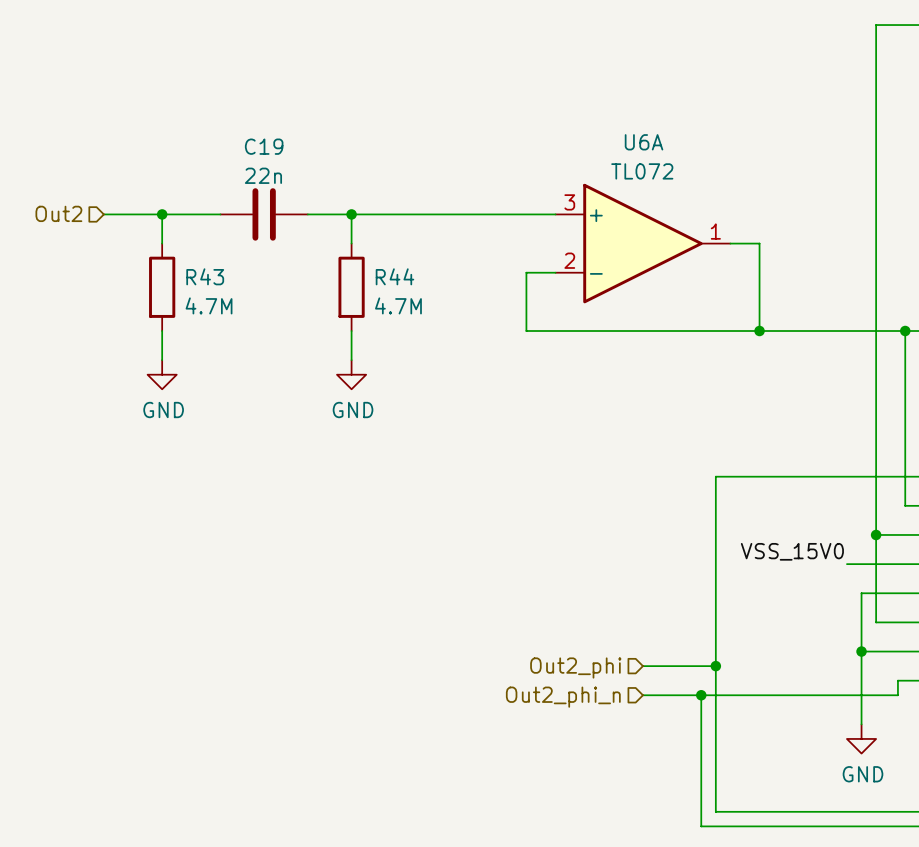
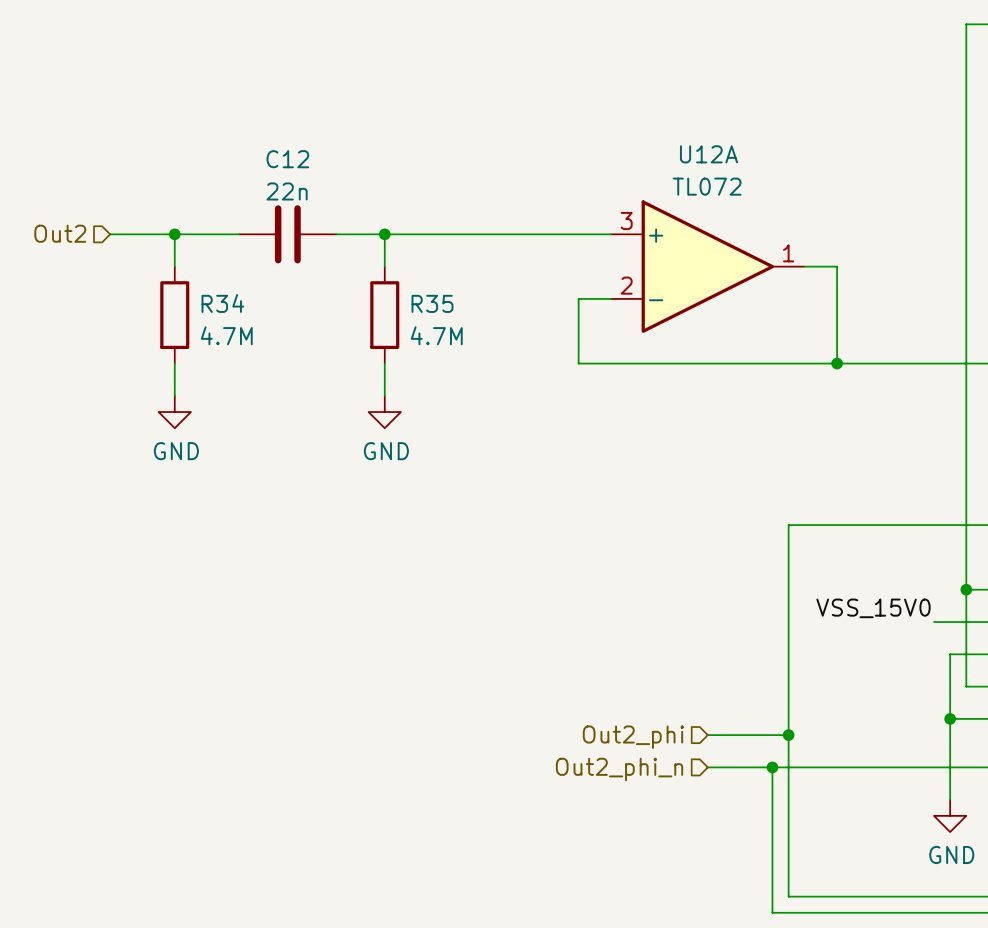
U6A name: U6A (644, 142) -> U12A (709, 154)
C19 name: C19 (264, 146) -> C12 (287, 159)
R43 name: R43 (205, 276) -> R34 (222, 303)
R44 name: R44 (394, 276) -> R35 (432, 303)

